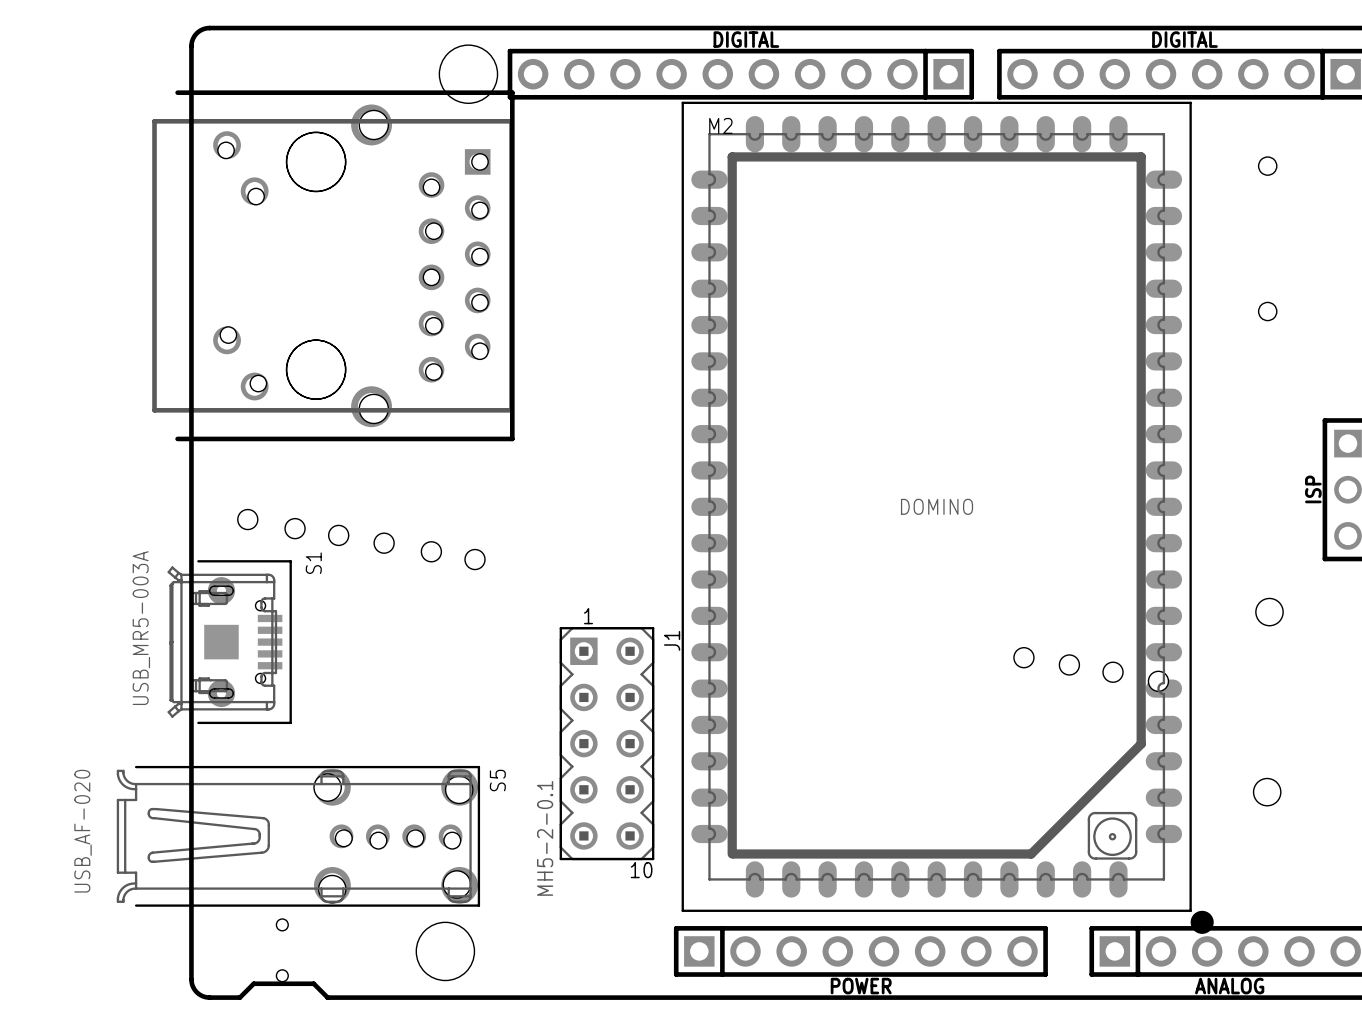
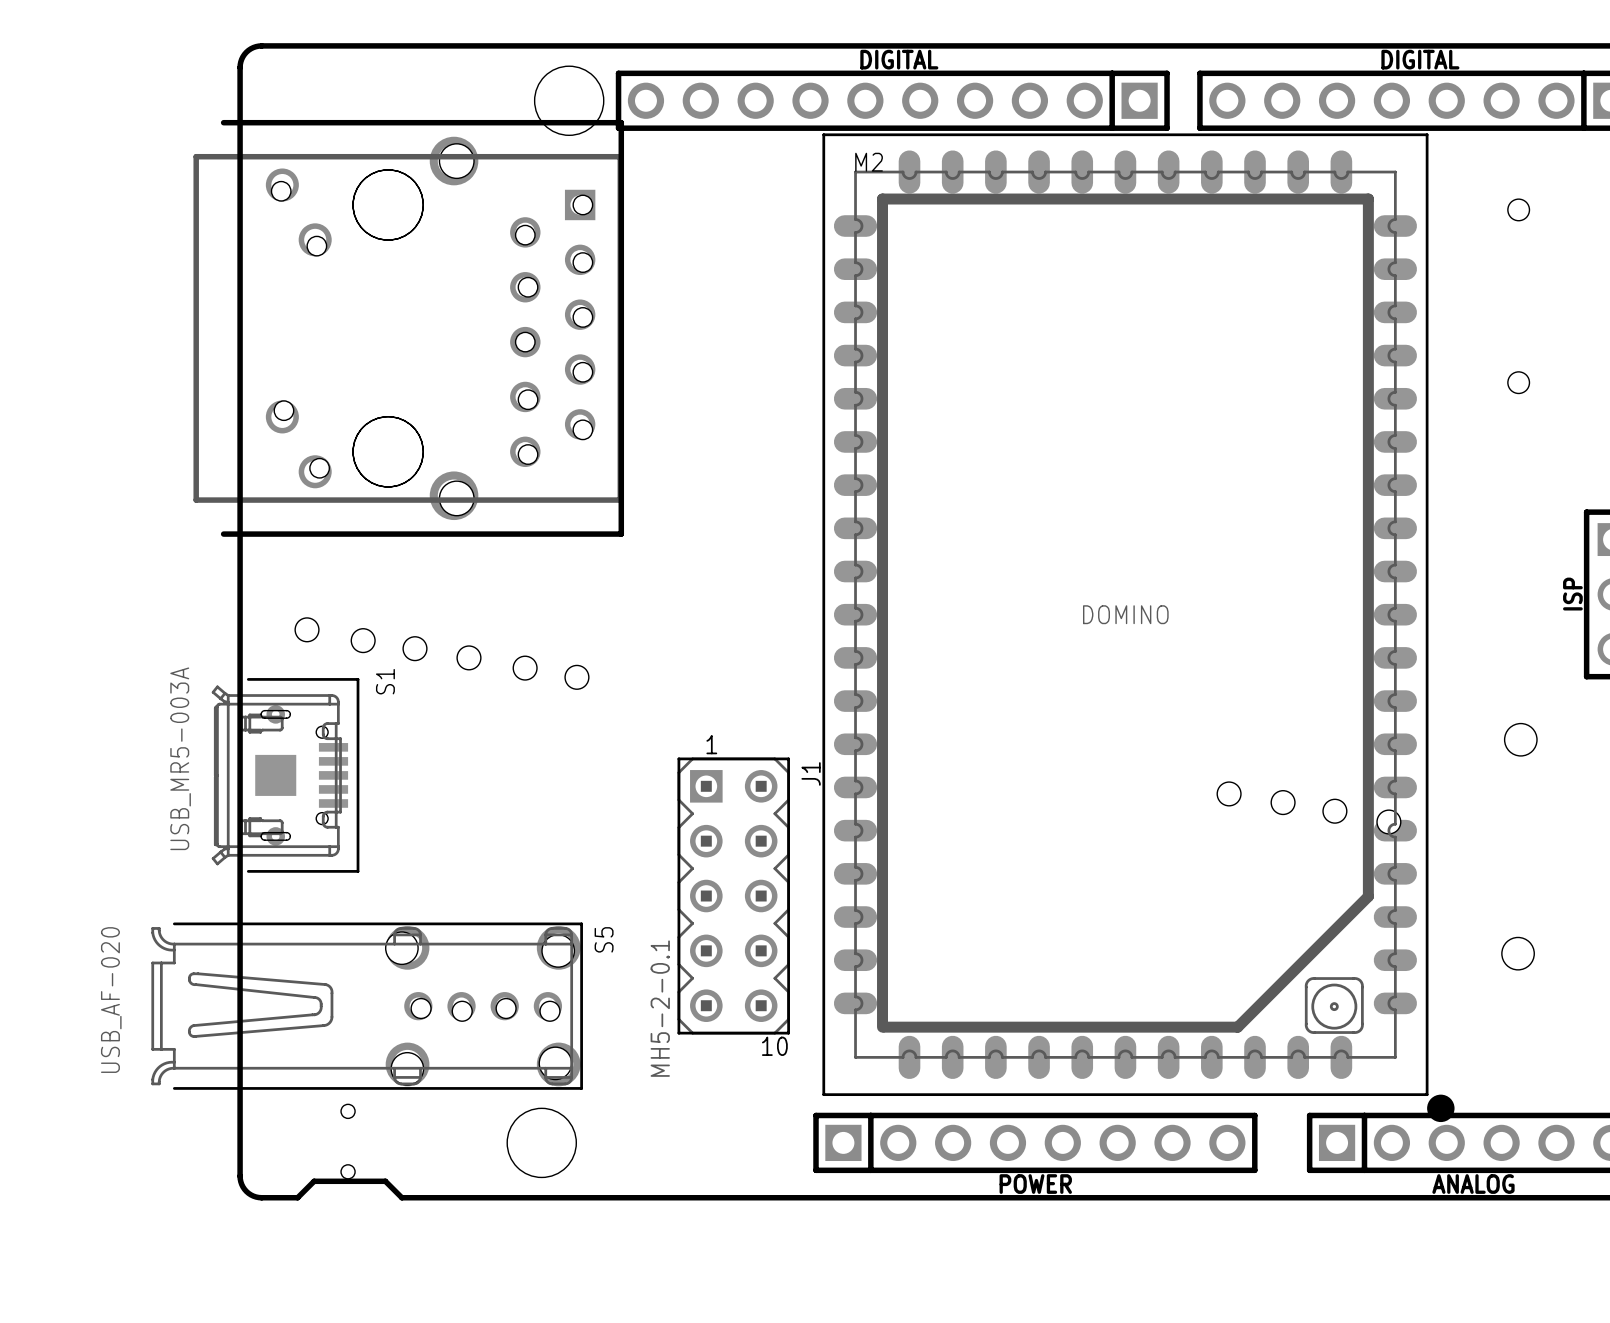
S1 footprint: [167, 560, 292, 725] -> [211, 678, 360, 873]

